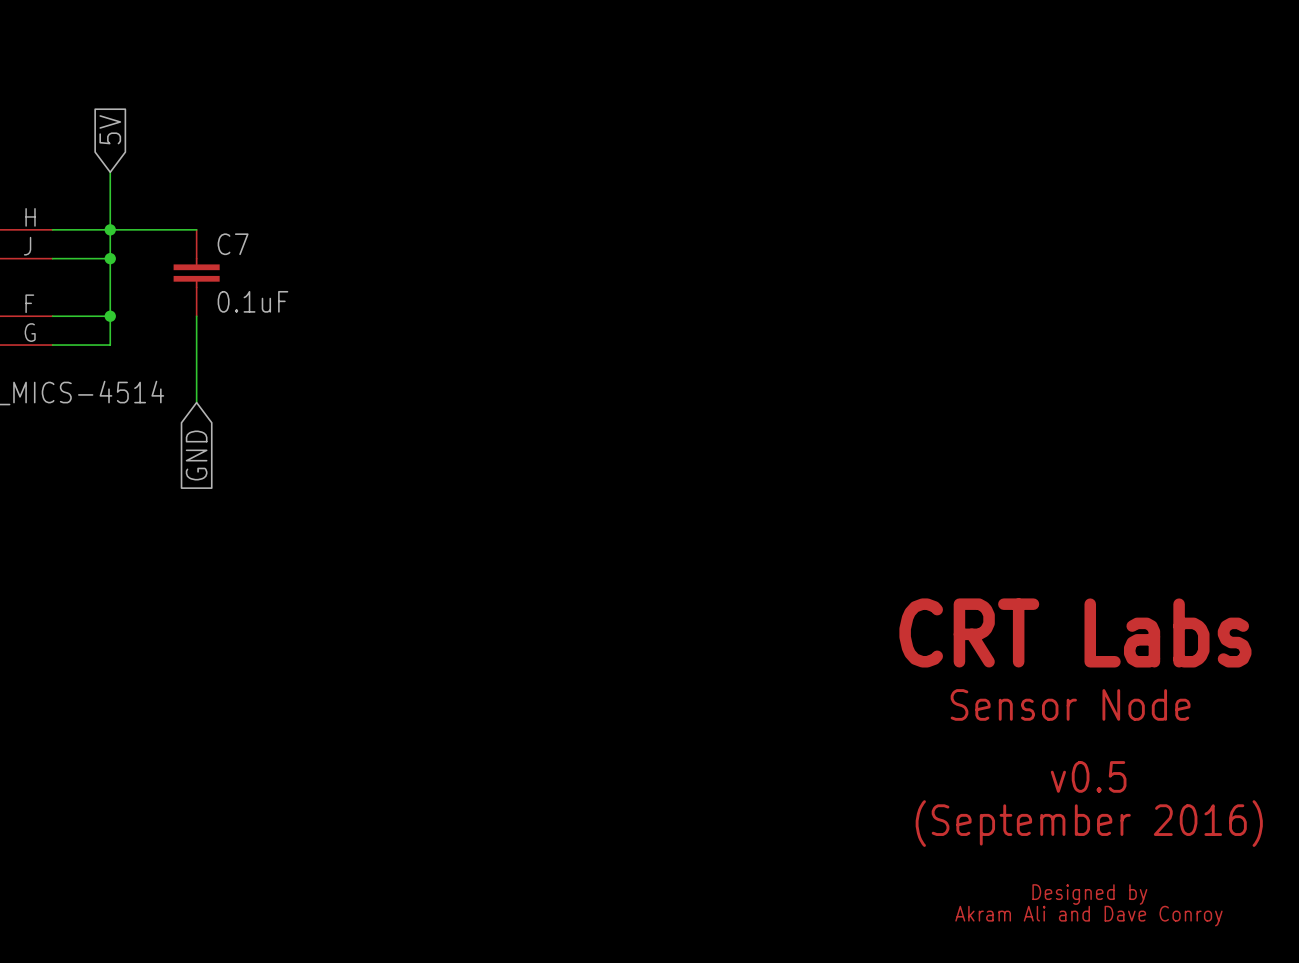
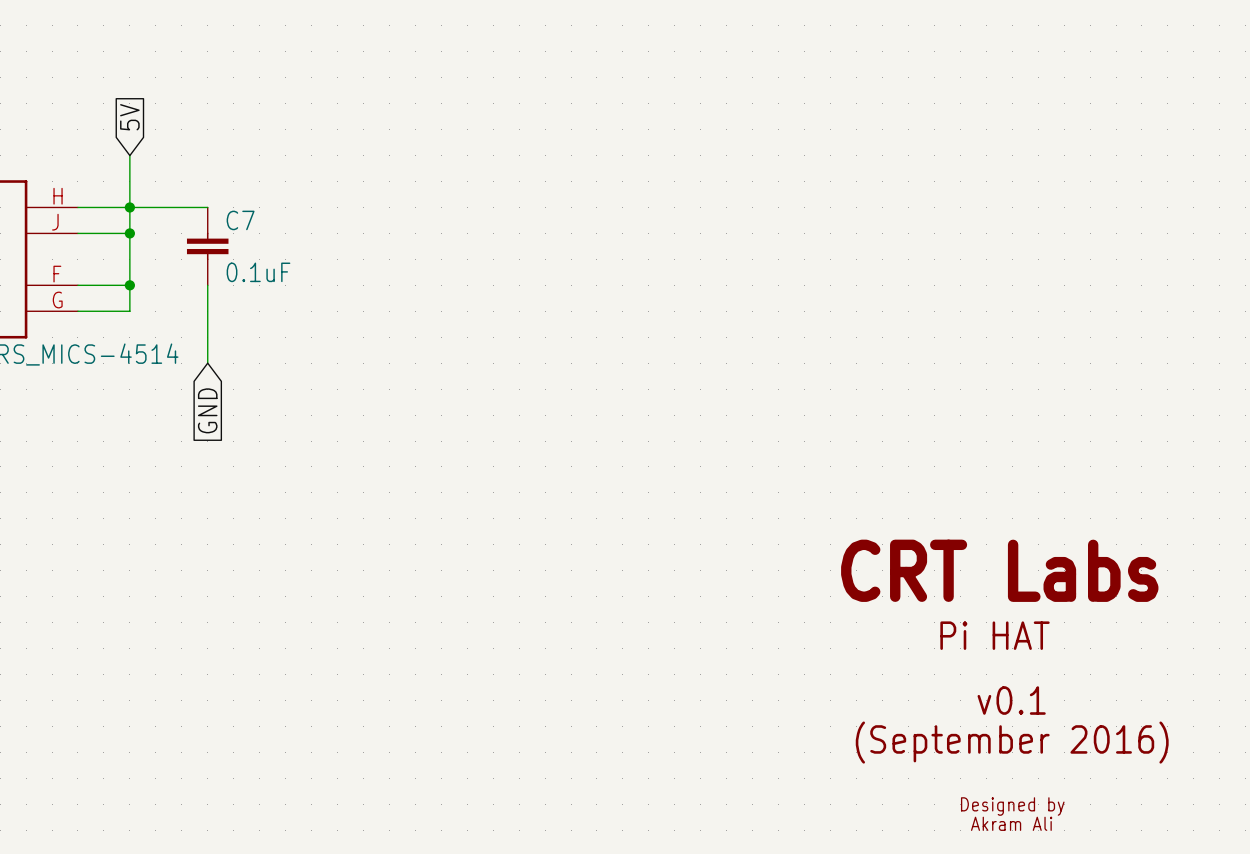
text: Sensor Node (1070, 704) -> none
text: none -> Pi HAT (995, 635)
text: v0.5 (1088, 776) -> v0.1 (1011, 700)
text: Akram Ali and Dave Conroy (1088, 916) -> Akram Ali (1011, 823)

